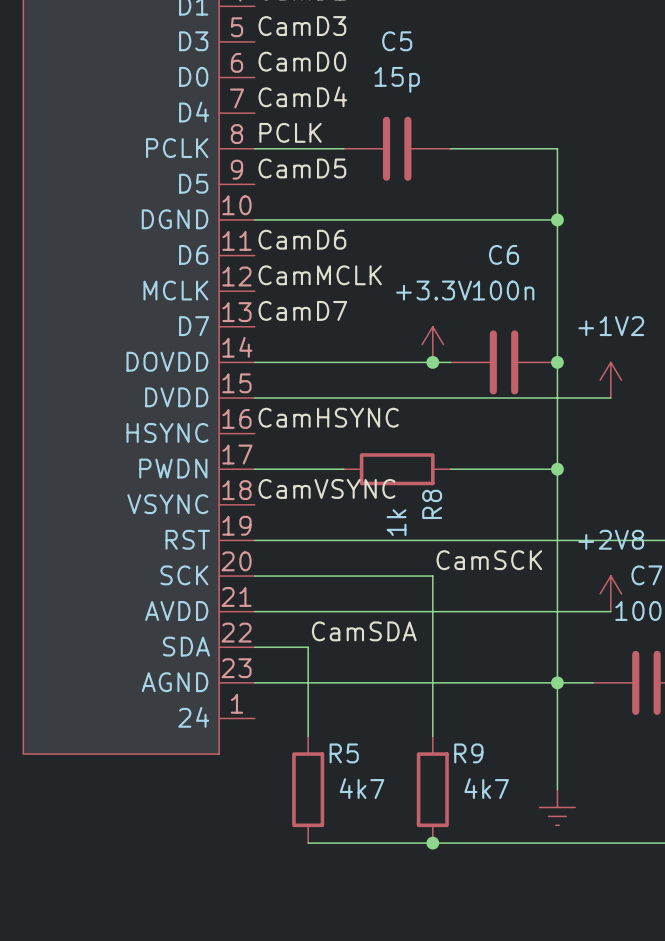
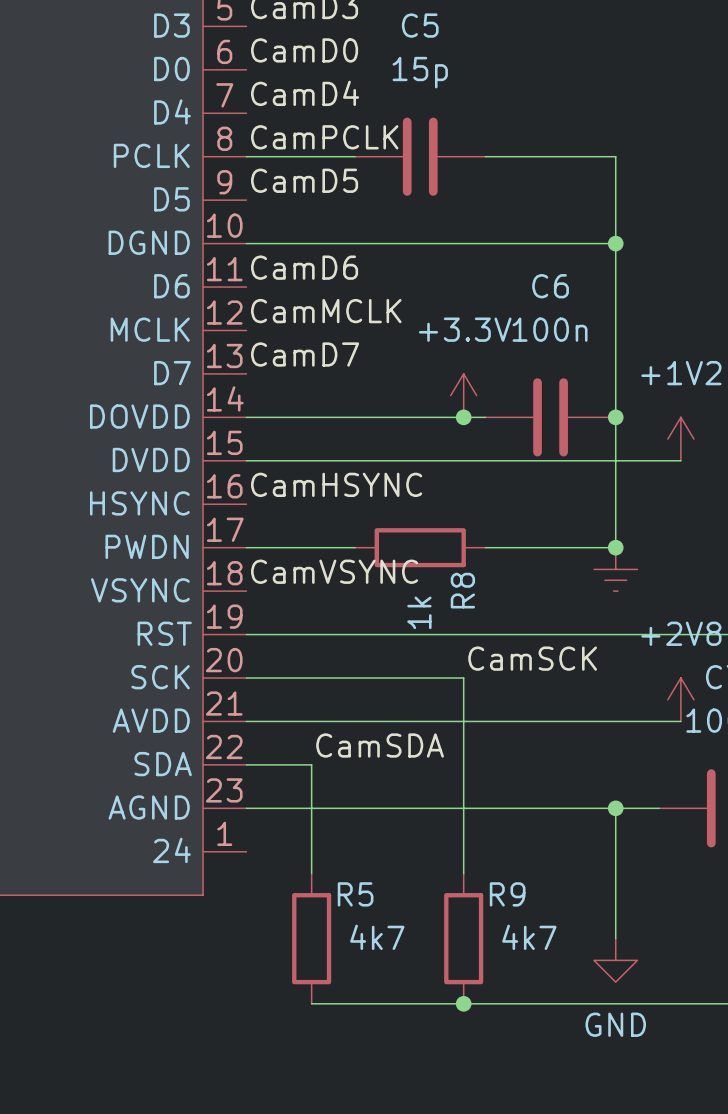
label: PCLK (290, 132) -> CamPCLK (324, 137)
wire: (557, 469) (557, 682) -> none
power symbol: none -> (615, 569)
power symbol shape: [539, 789, 576, 826] -> [594, 938, 638, 983]
power symbol text: none -> GND (615, 1024)

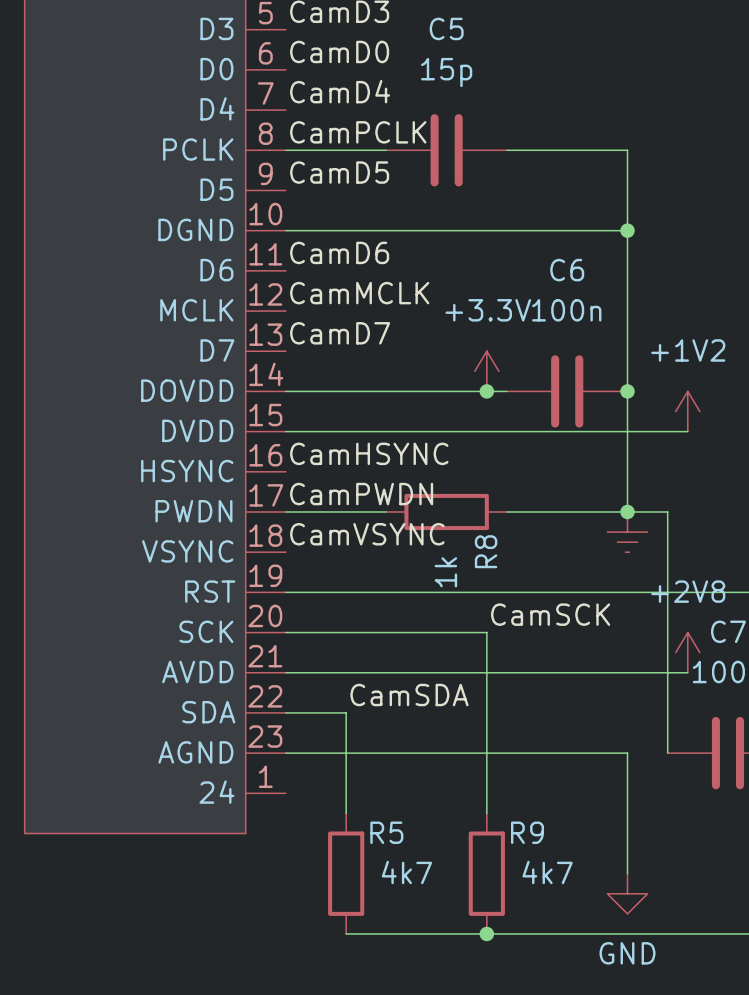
label: none -> CamPWDN (361, 494)
wire: (615, 808) (659, 808) -> (627, 511) (667, 511) (667, 753)
junction: (615, 808) -> none

